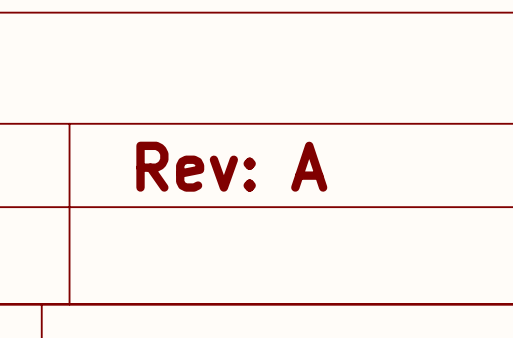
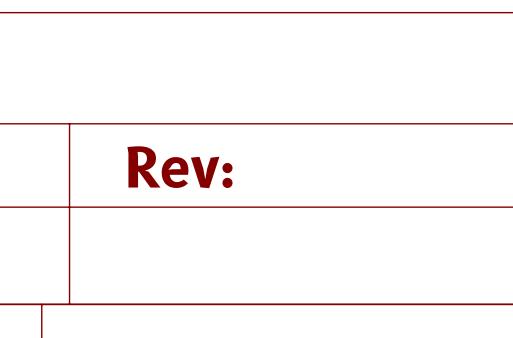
title block: Rev: A (231, 166) -> Rev: (179, 167)

